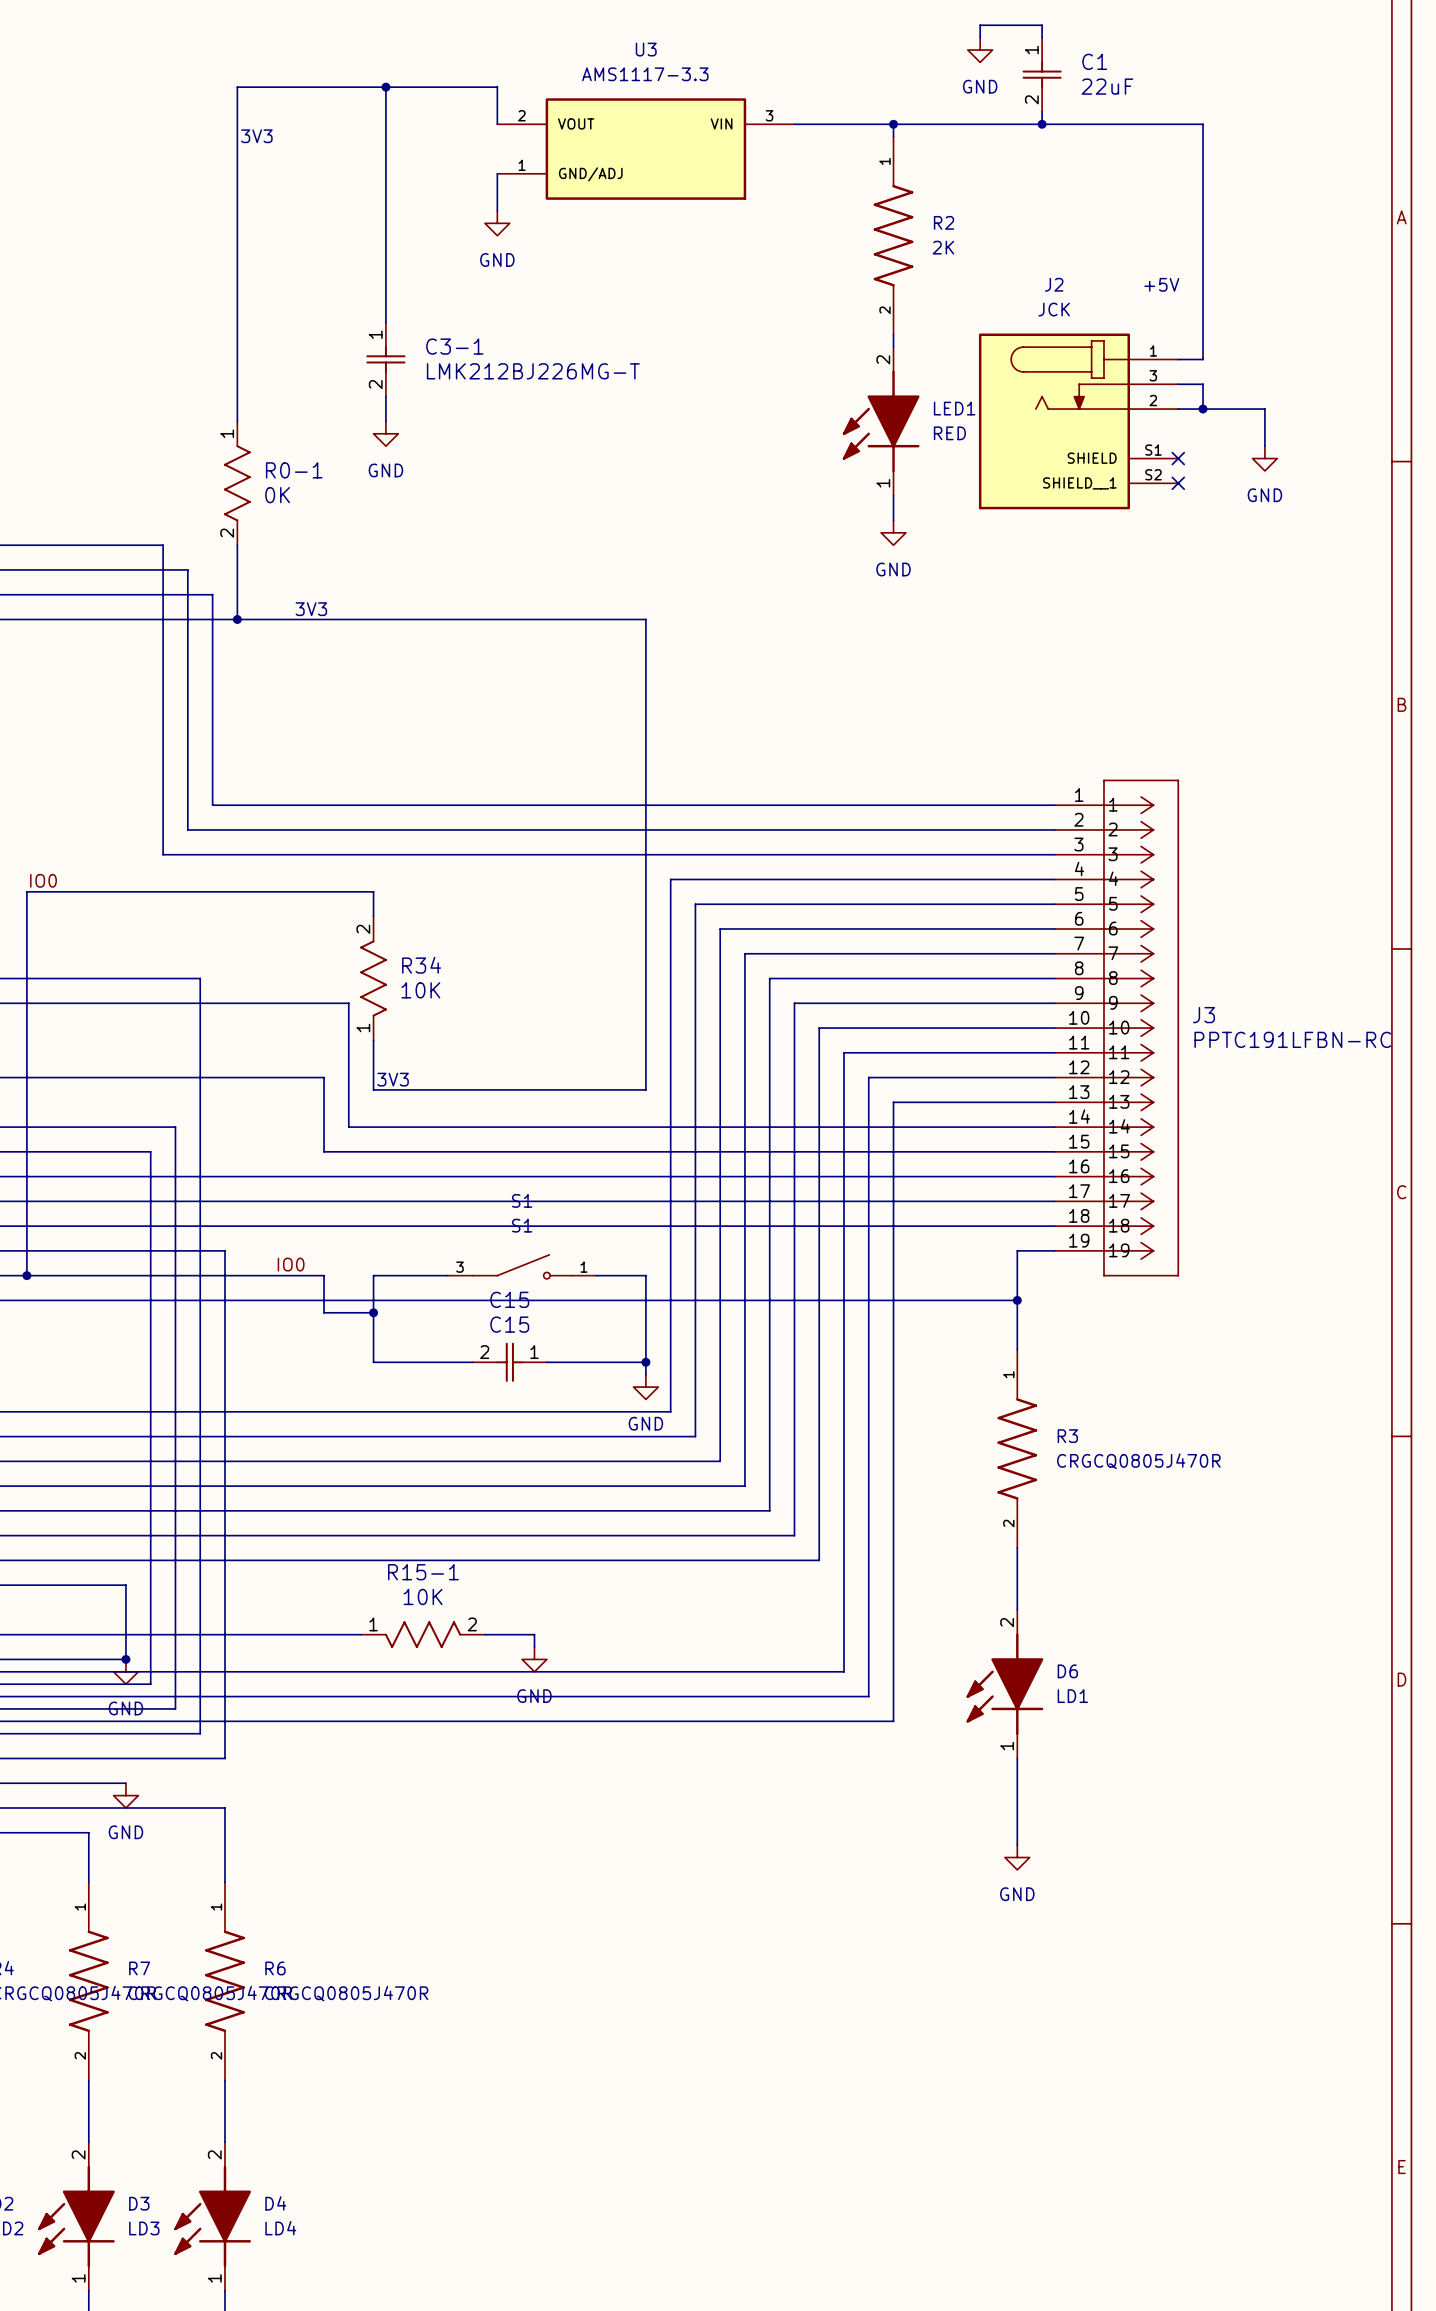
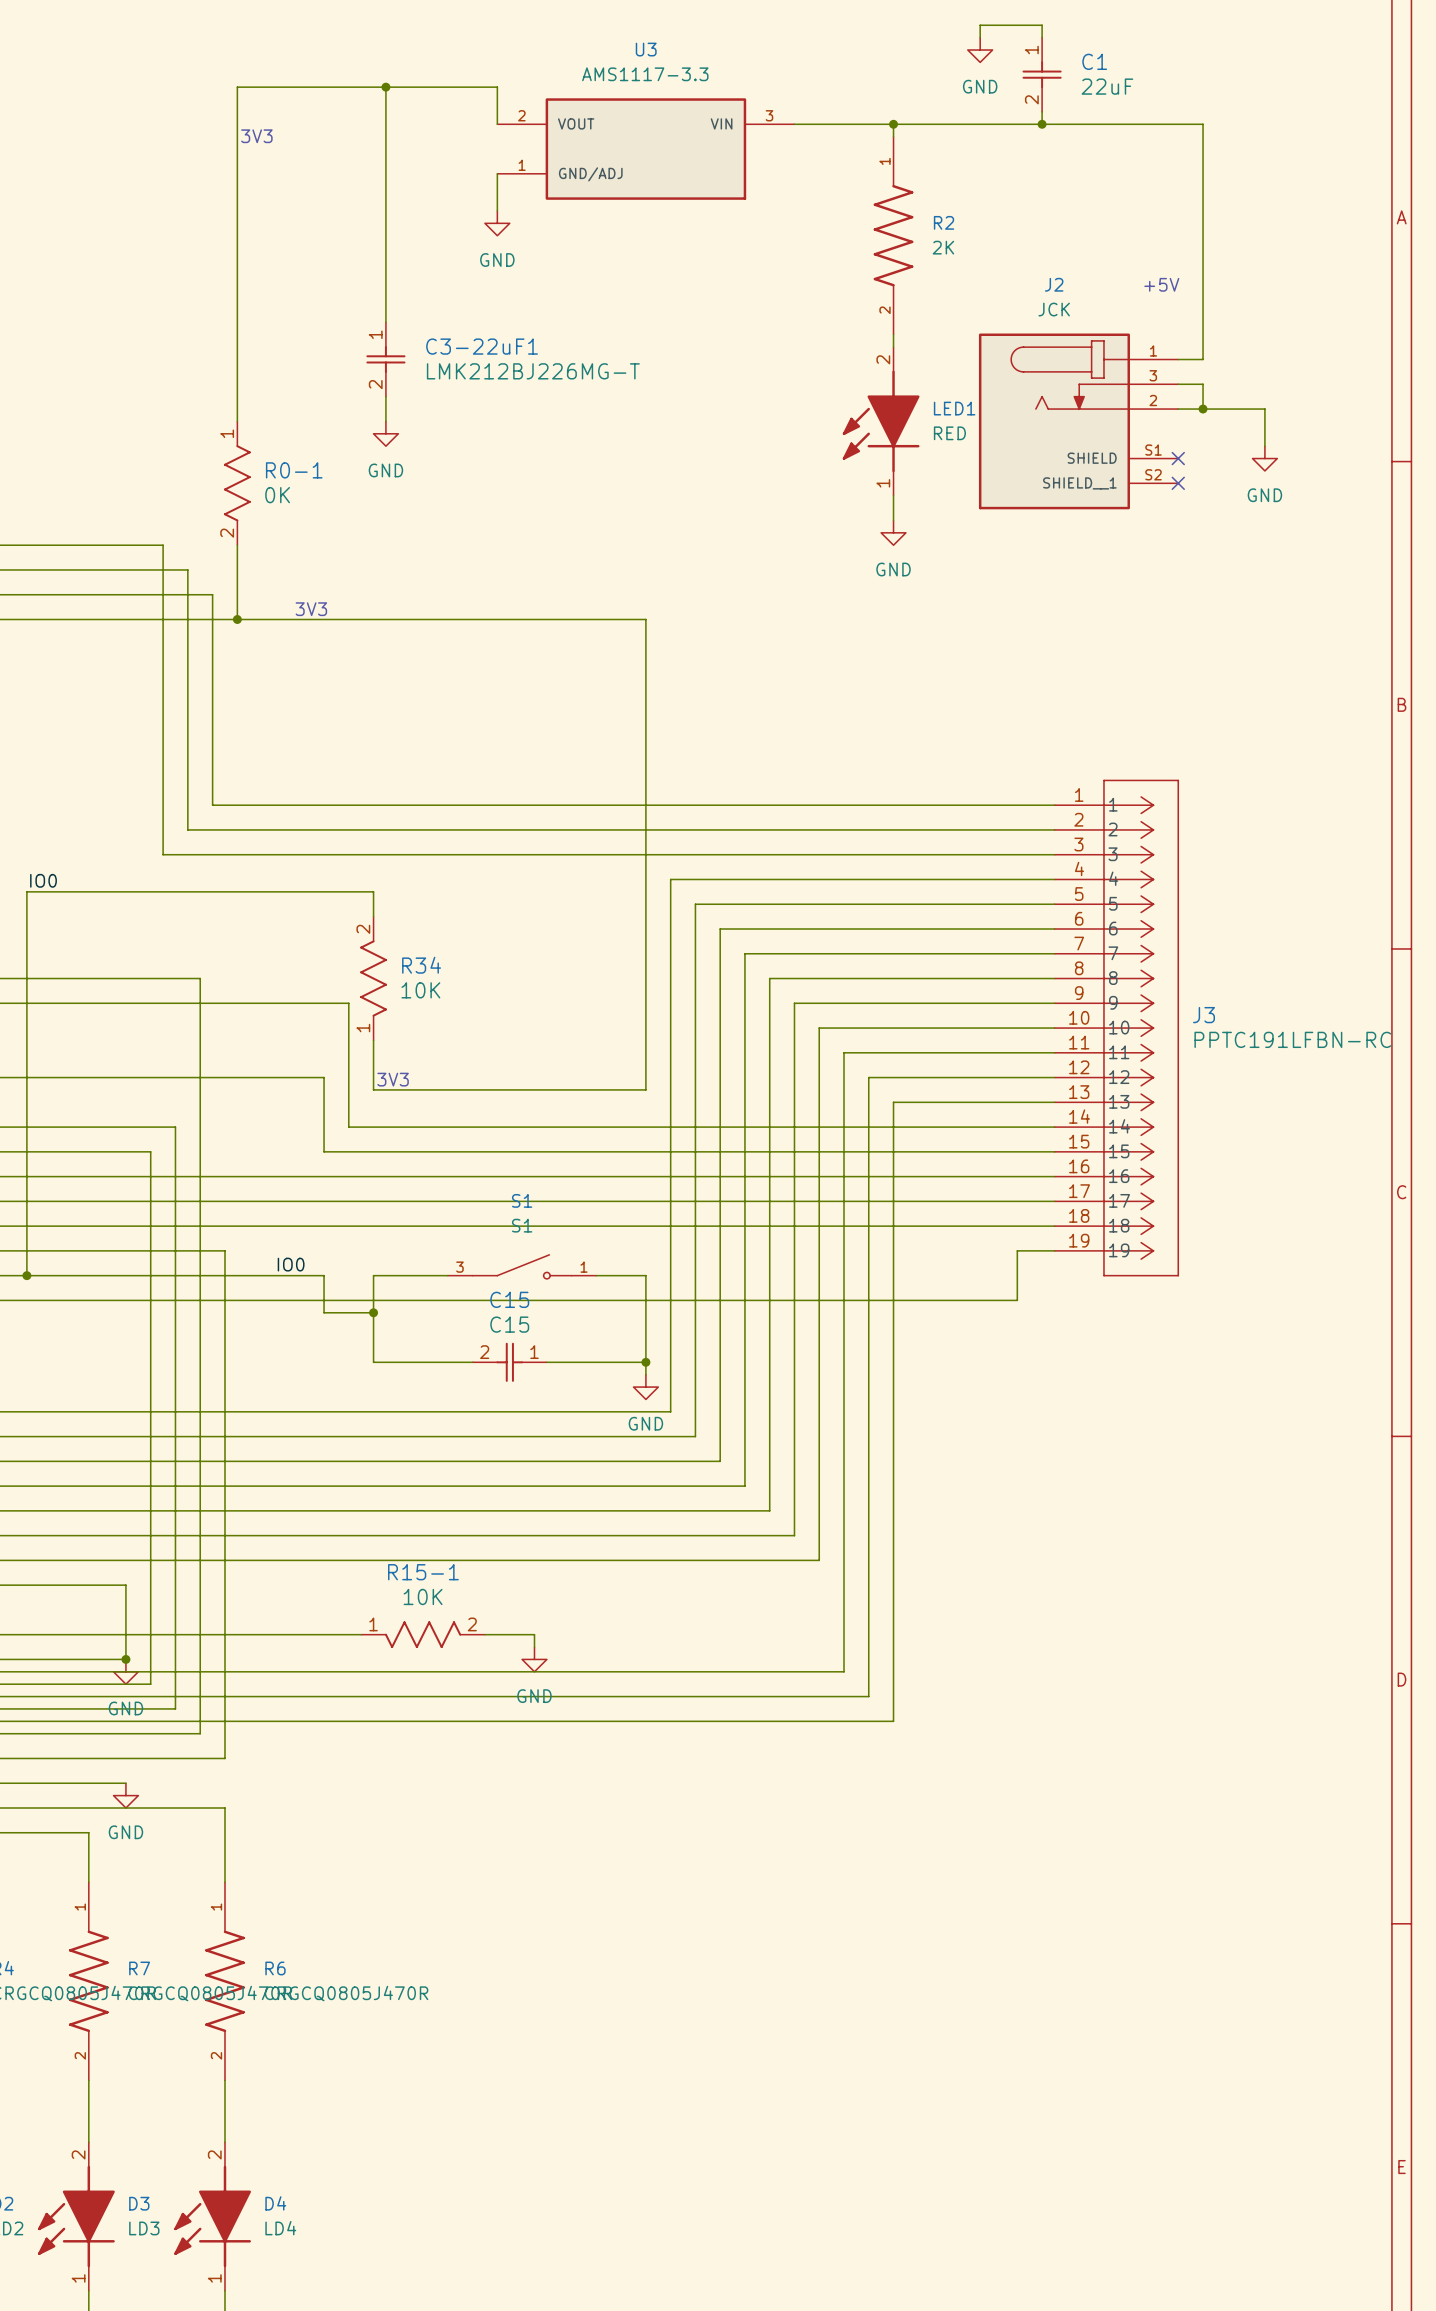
C3-1 name: C3-1 (454, 346) -> C3-22uF1 (482, 346)
wire: (1017, 1300) (1017, 1349) -> none
junction: (1017, 1300) -> none
R3: CRGCQ0805J470R (1017, 1448) -> none
wire: (1017, 1548) (1017, 1609) -> none
D6: LD1 (1004, 1684) -> none
wire: (1017, 1758) (1017, 1845) -> none
power symbol: GND (1017, 1857) -> none

